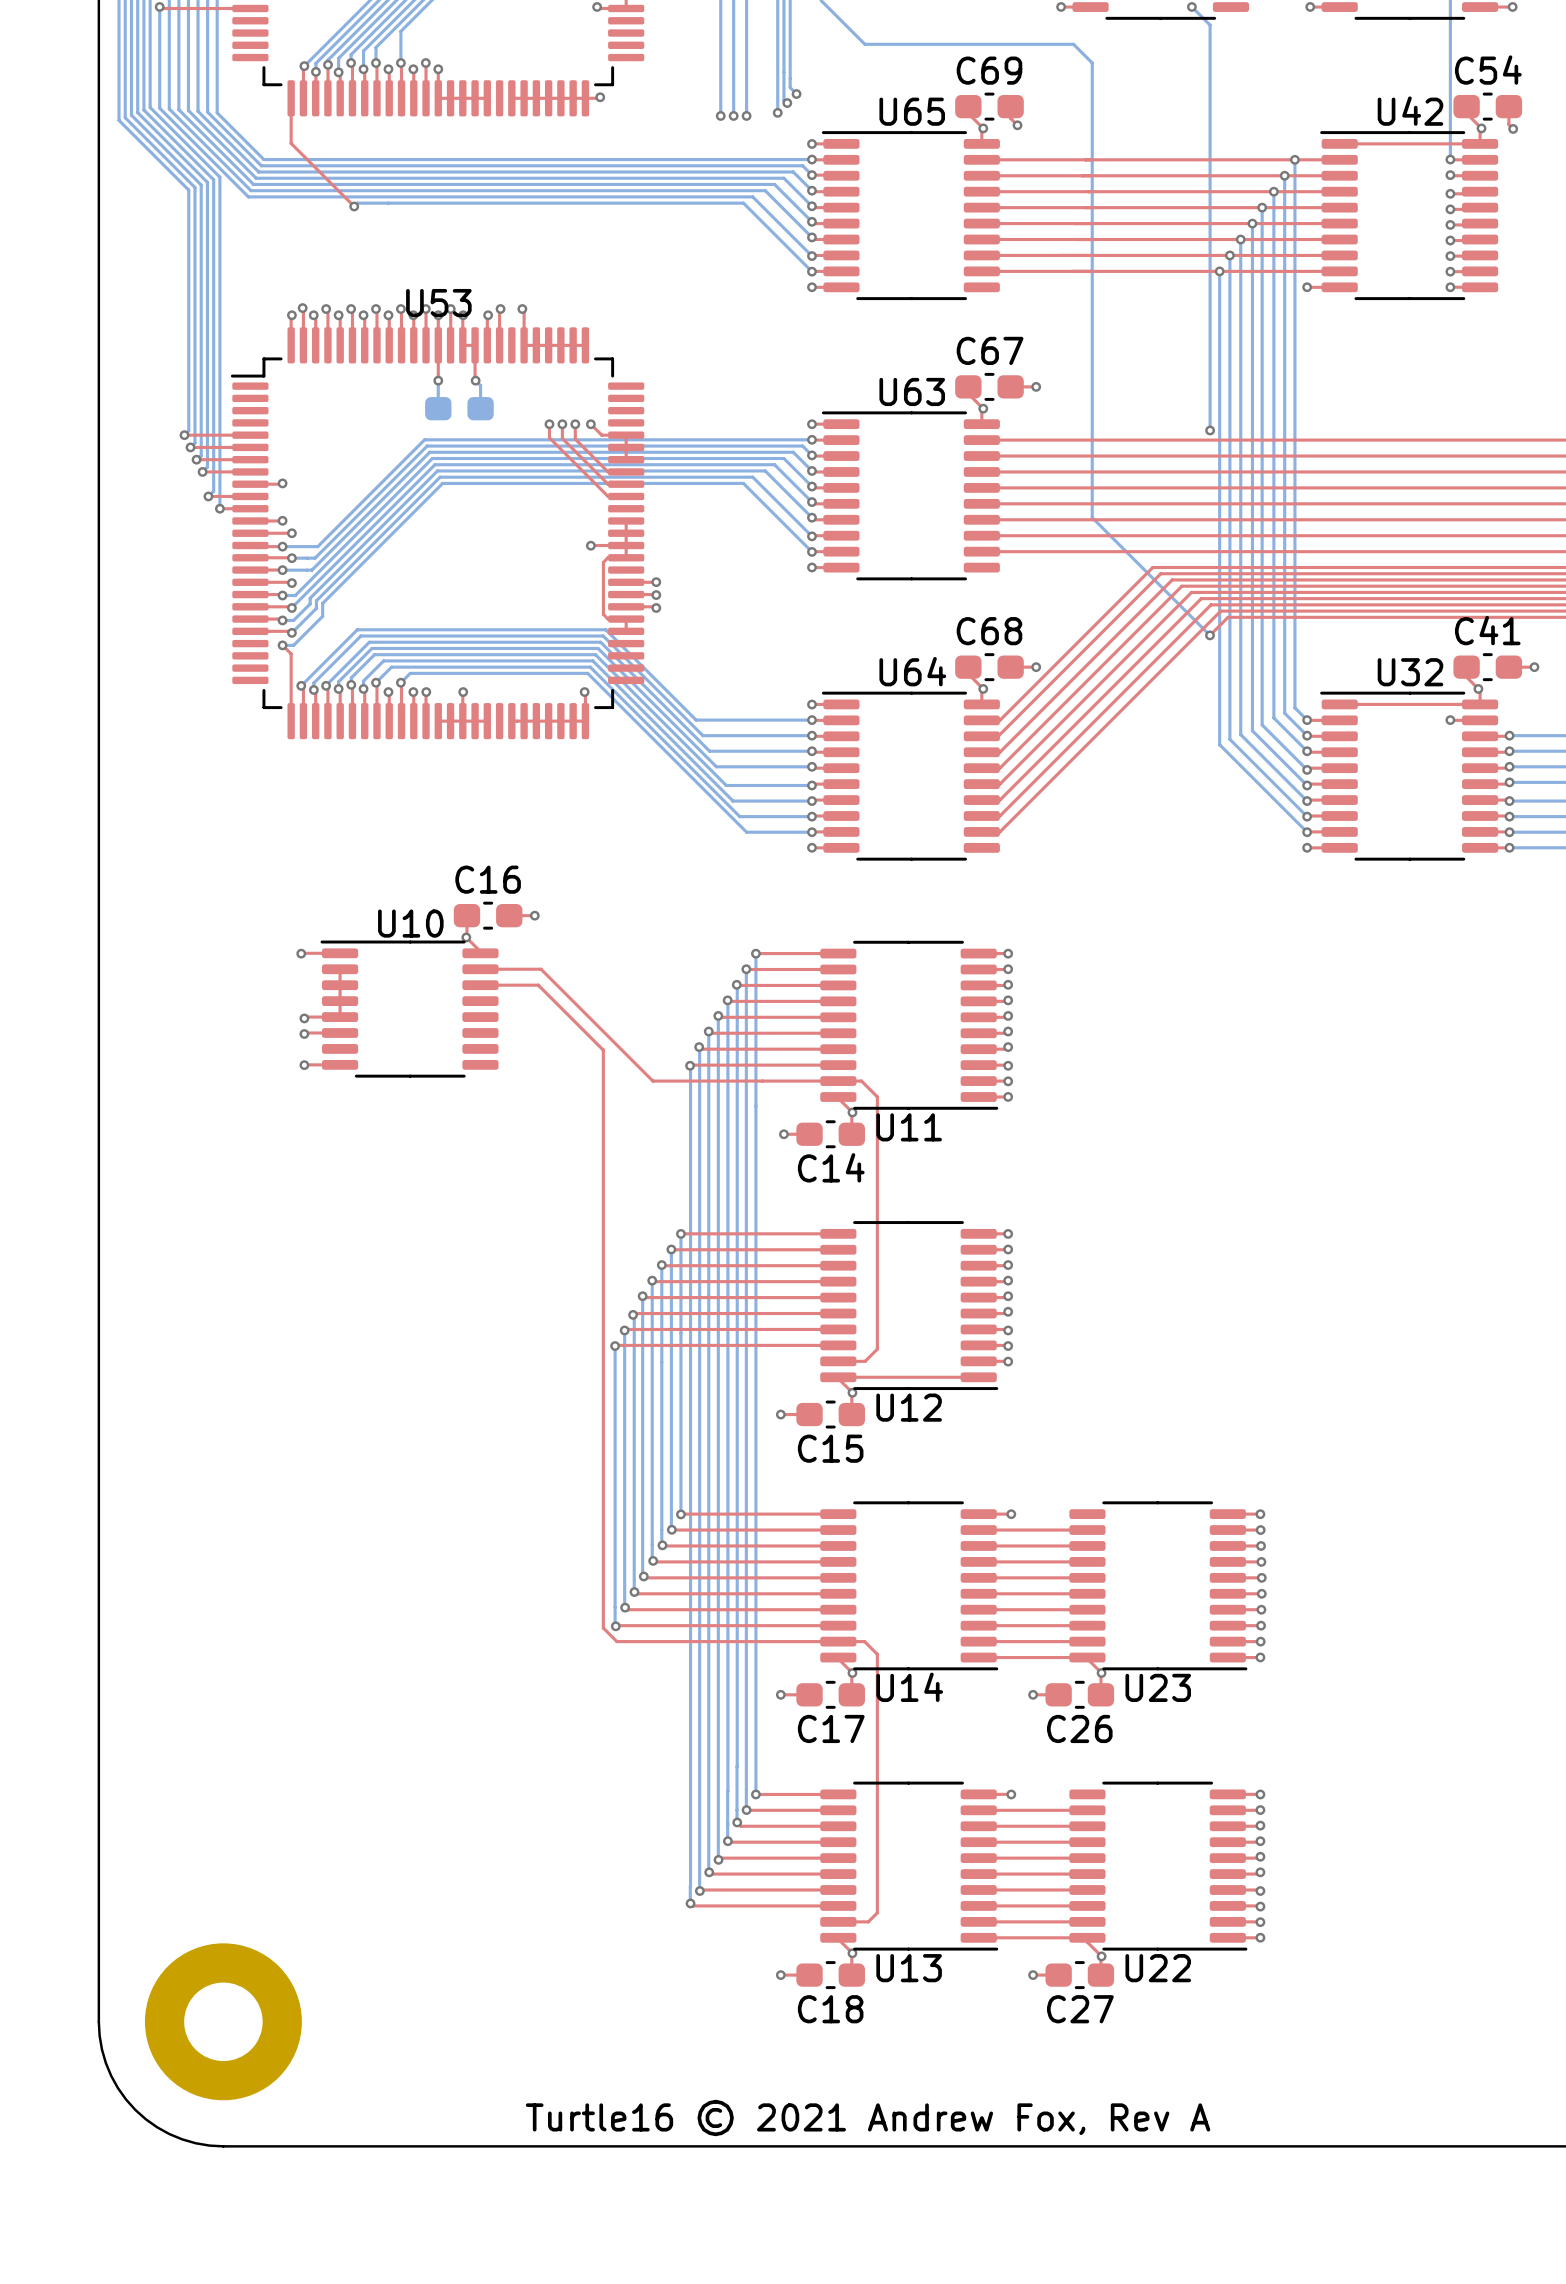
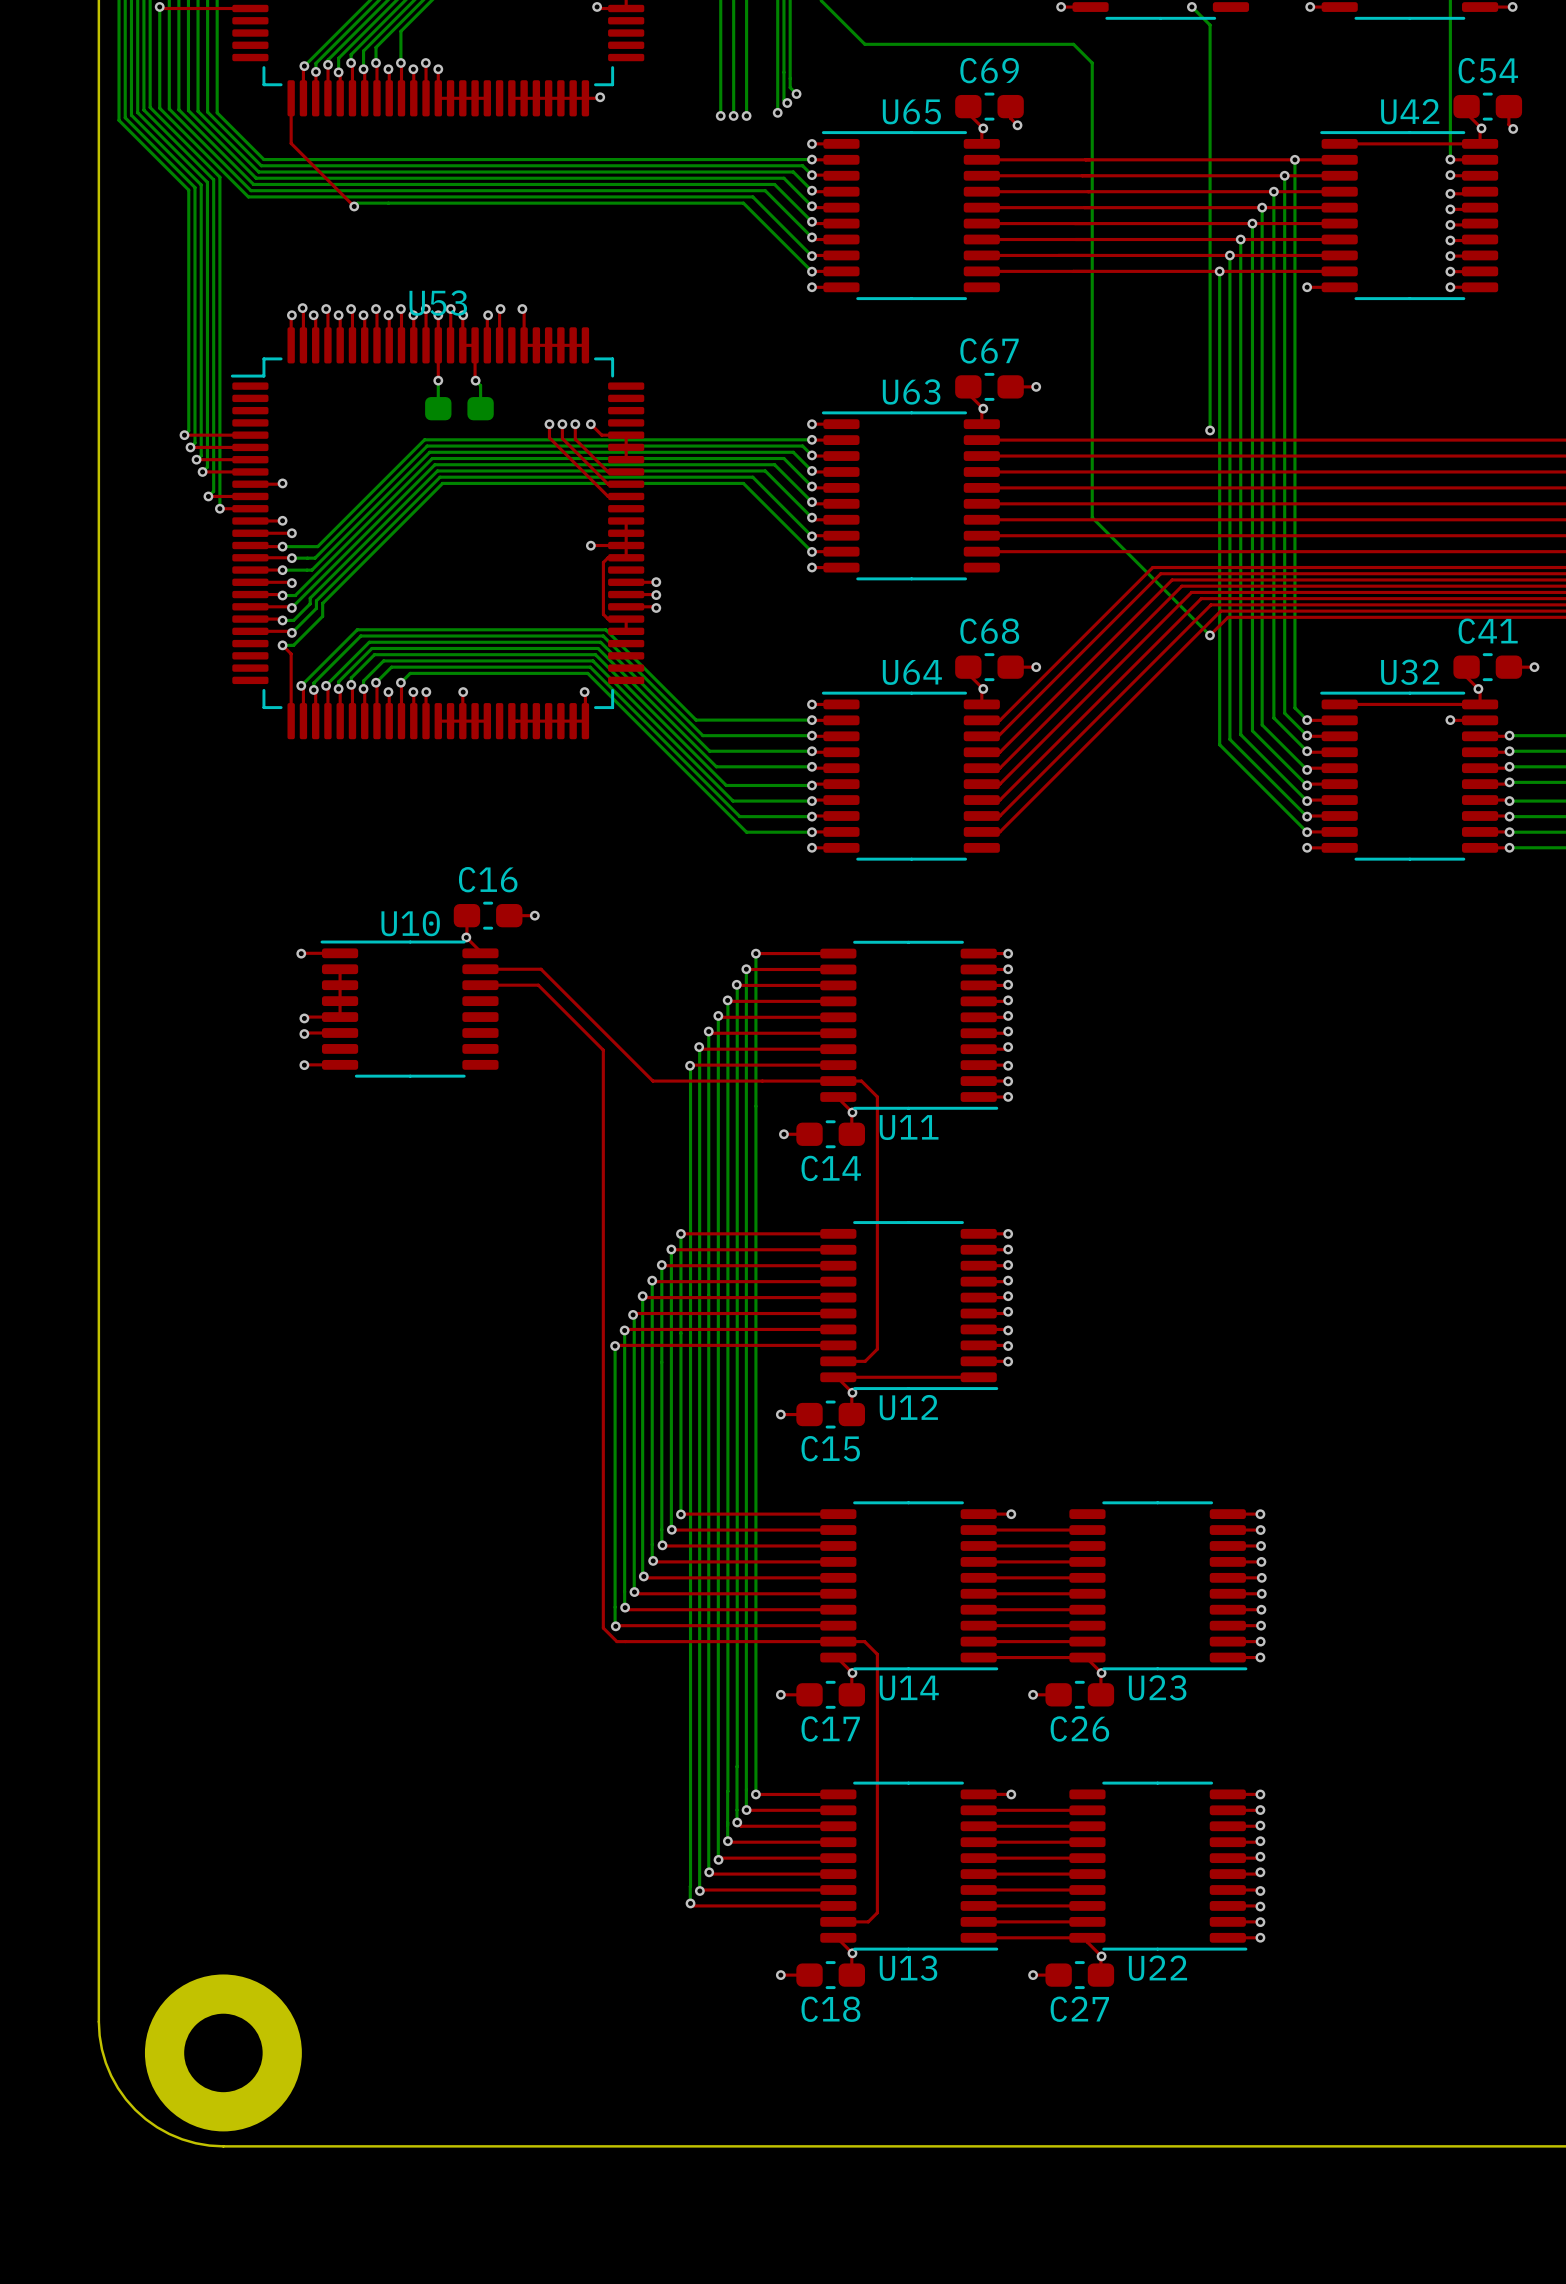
part position: (223, 2021) -> (223, 2052)
text: Turtle16 © 2021 Andrew Fox, Rev A (868, 2118) -> none

